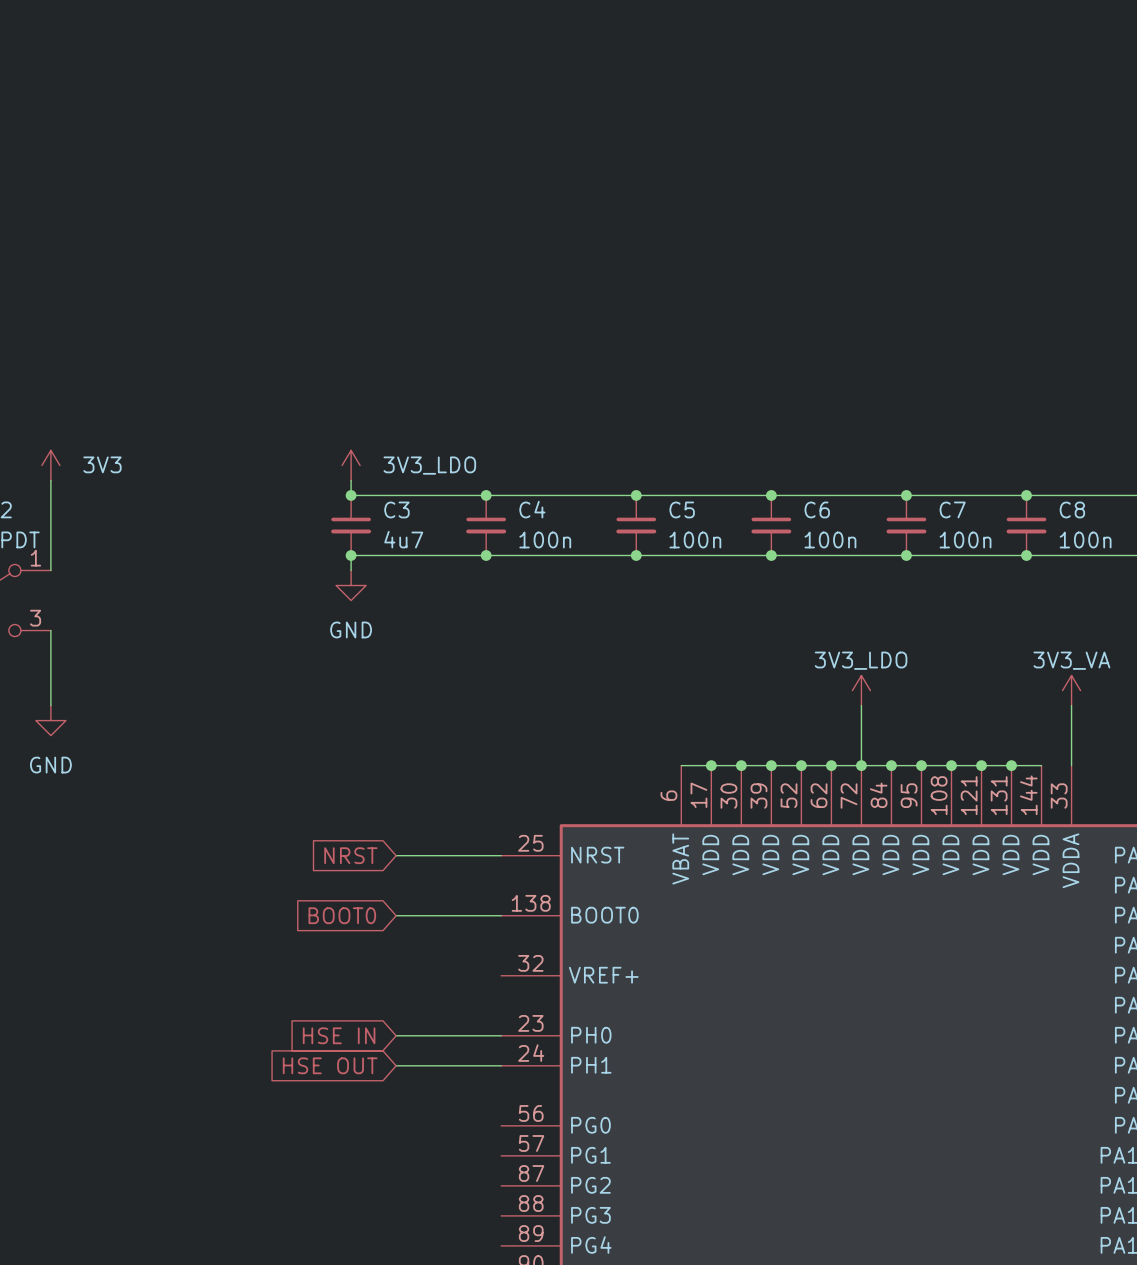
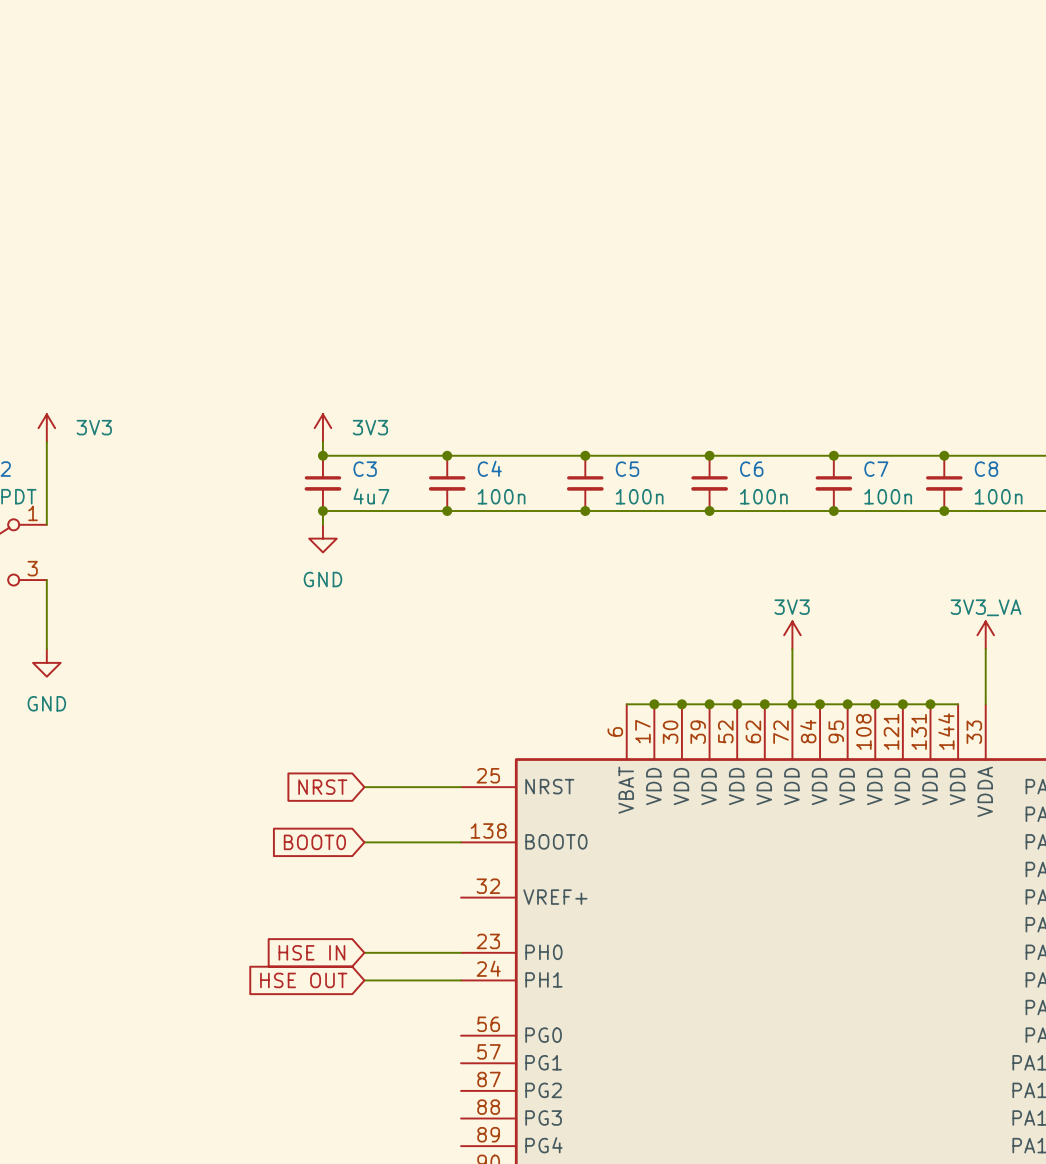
power symbol: 3V3_LDO (351, 465) -> 3V3 (322, 428)
power symbol: 3V3_LDO (861, 690) -> 3V3 (792, 635)

